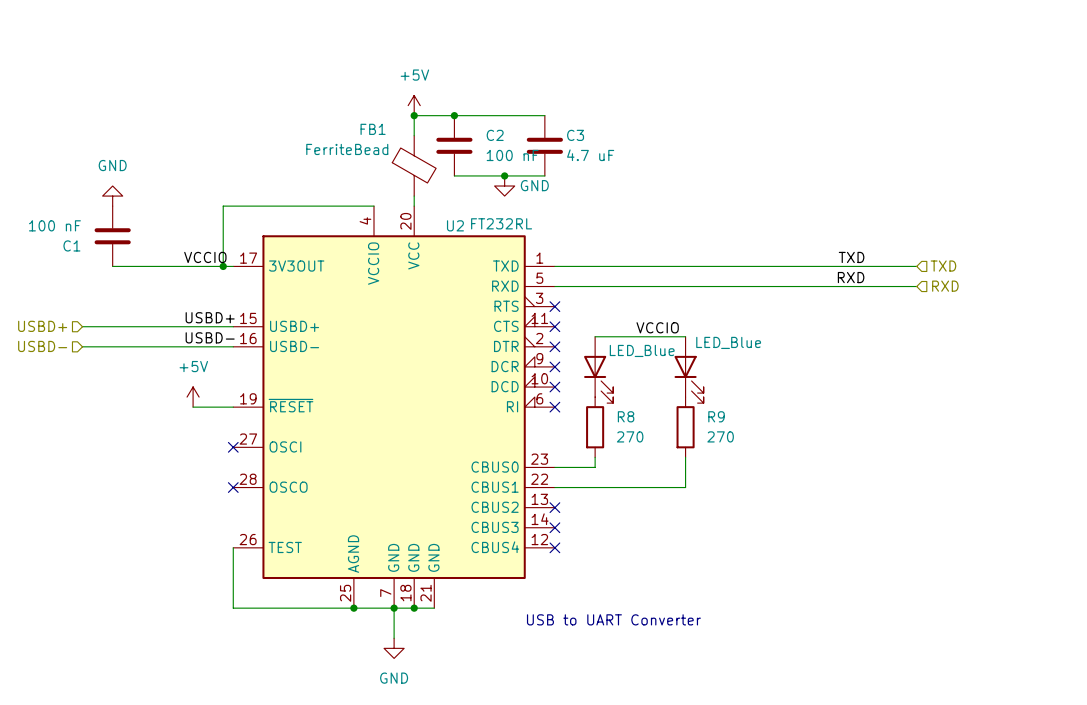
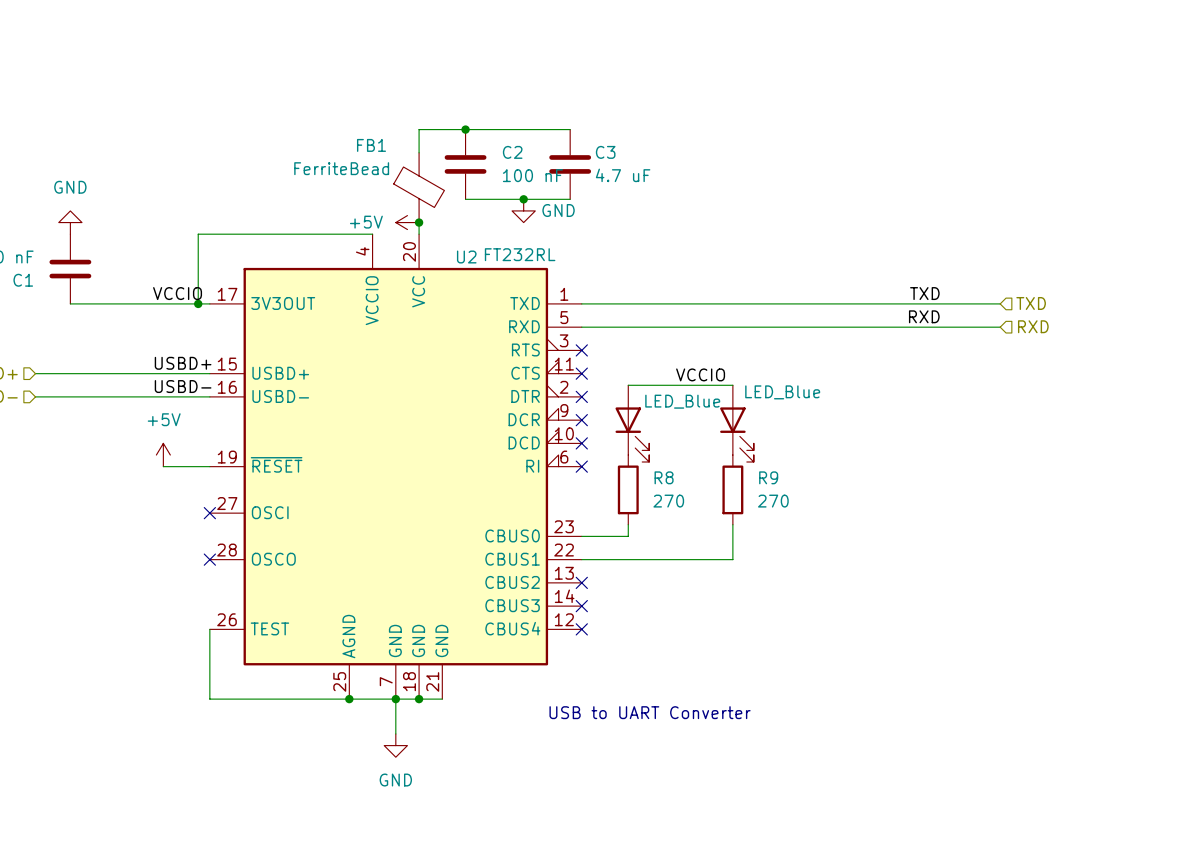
power symbol rotation: 0° (414, 105) -> 90° counterclockwise (407, 222)
power symbol position: +5V (414, 105) -> +5V (407, 222)
junction: (414, 115) -> none
junction: none -> (419, 222)

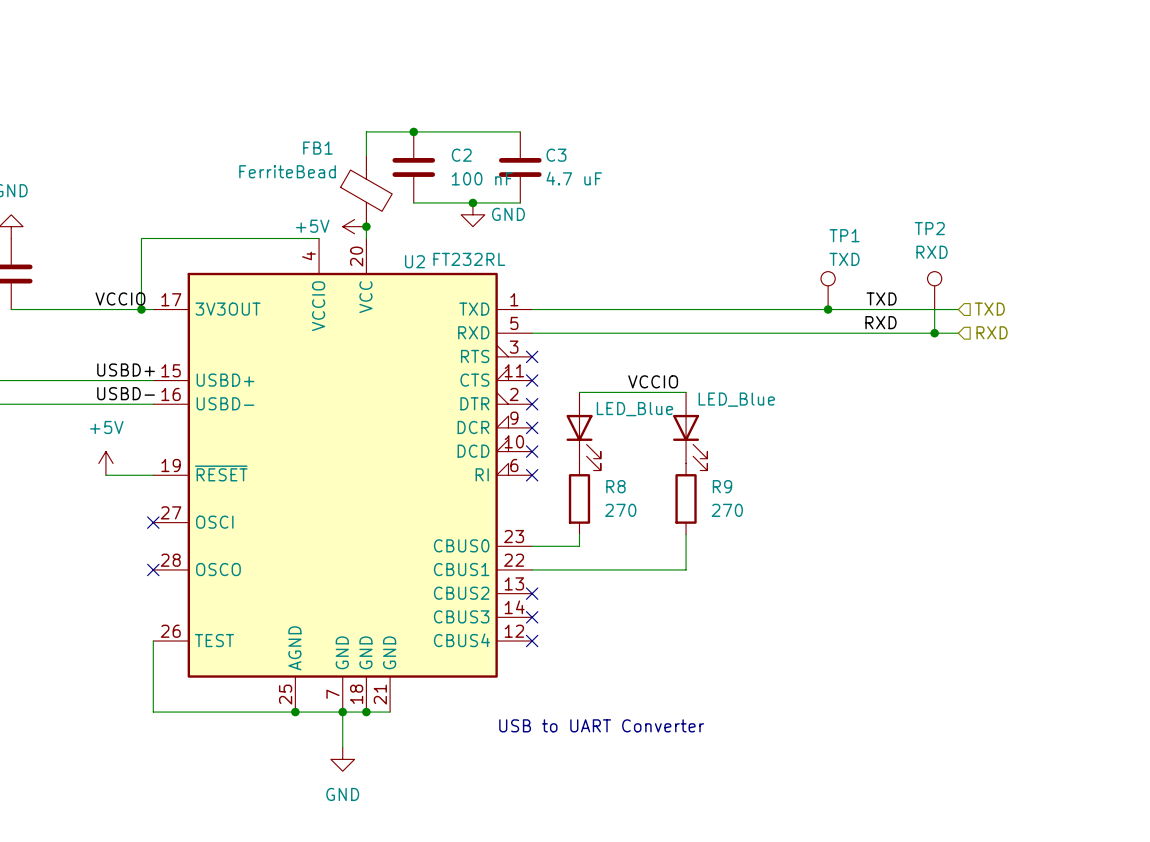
TP1: none -> TXD (828, 290)
TP2: none -> RXD (934, 290)
junction: none -> (828, 309)
wire: none -> (934, 309) (934, 333)
junction: none -> (934, 333)

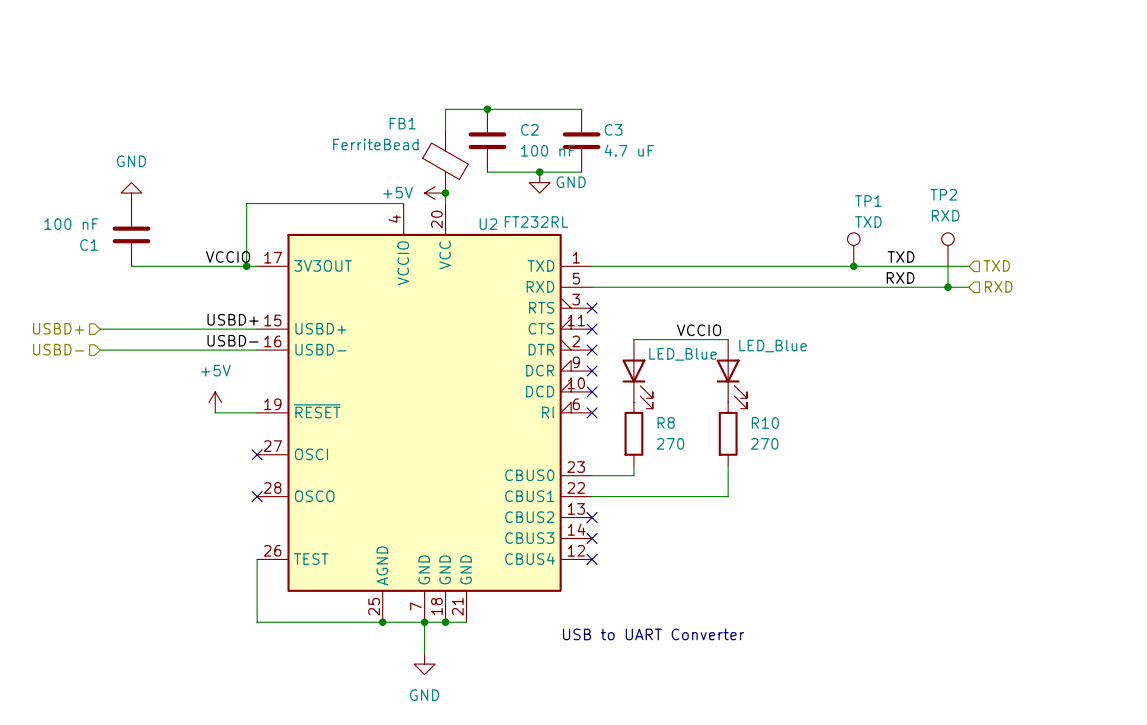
R9 name: R9 (722, 486) -> R10 (765, 422)

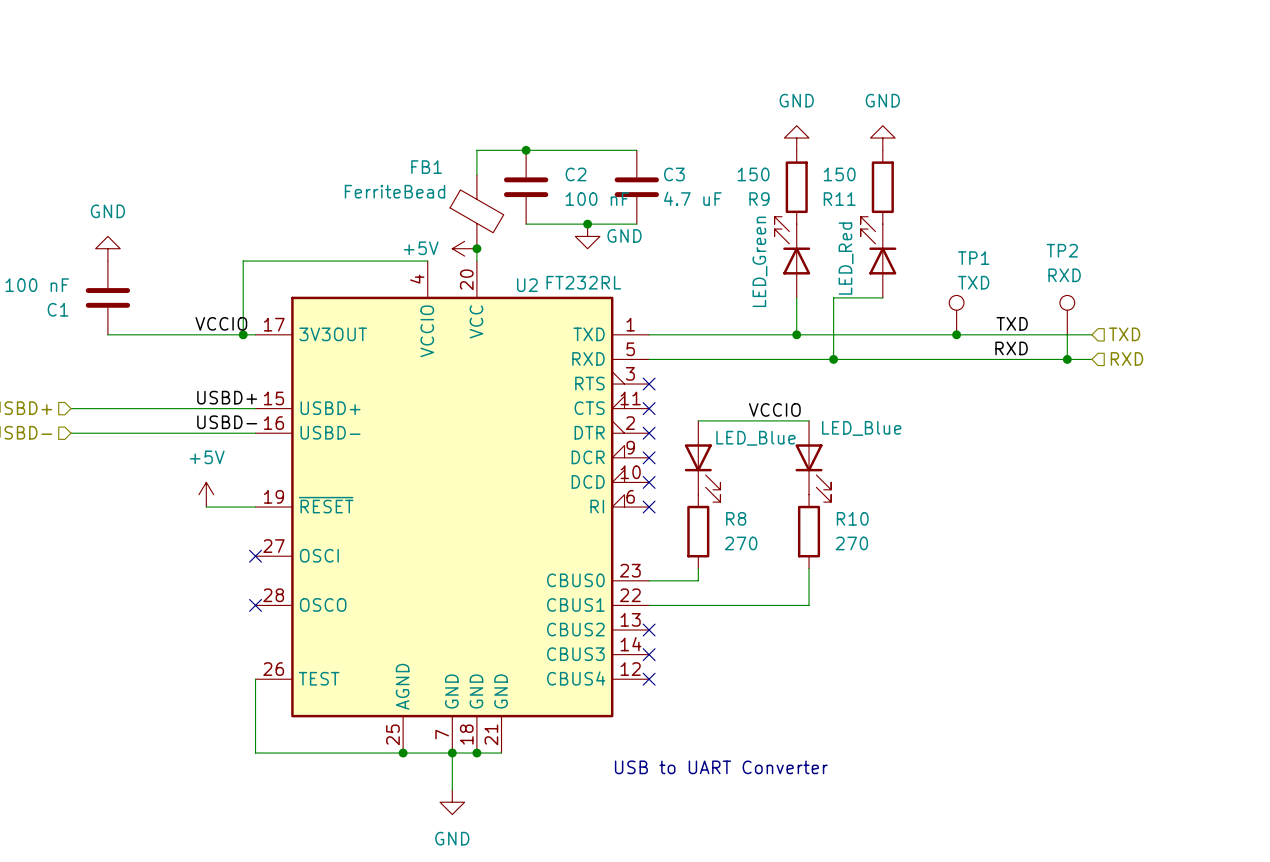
power symbol: none -> GND (796, 138)
power symbol: none -> GND (882, 138)
R9: none -> 150 (796, 187)
R11: none -> 150 (882, 187)
part: none -> LED_Green (792, 257)
part: none -> LED_Red (878, 257)
wire: none -> (796, 297) (796, 334)
wire: none -> (882, 297) (833, 297) (833, 359)
junction: none -> (796, 334)
junction: none -> (833, 359)

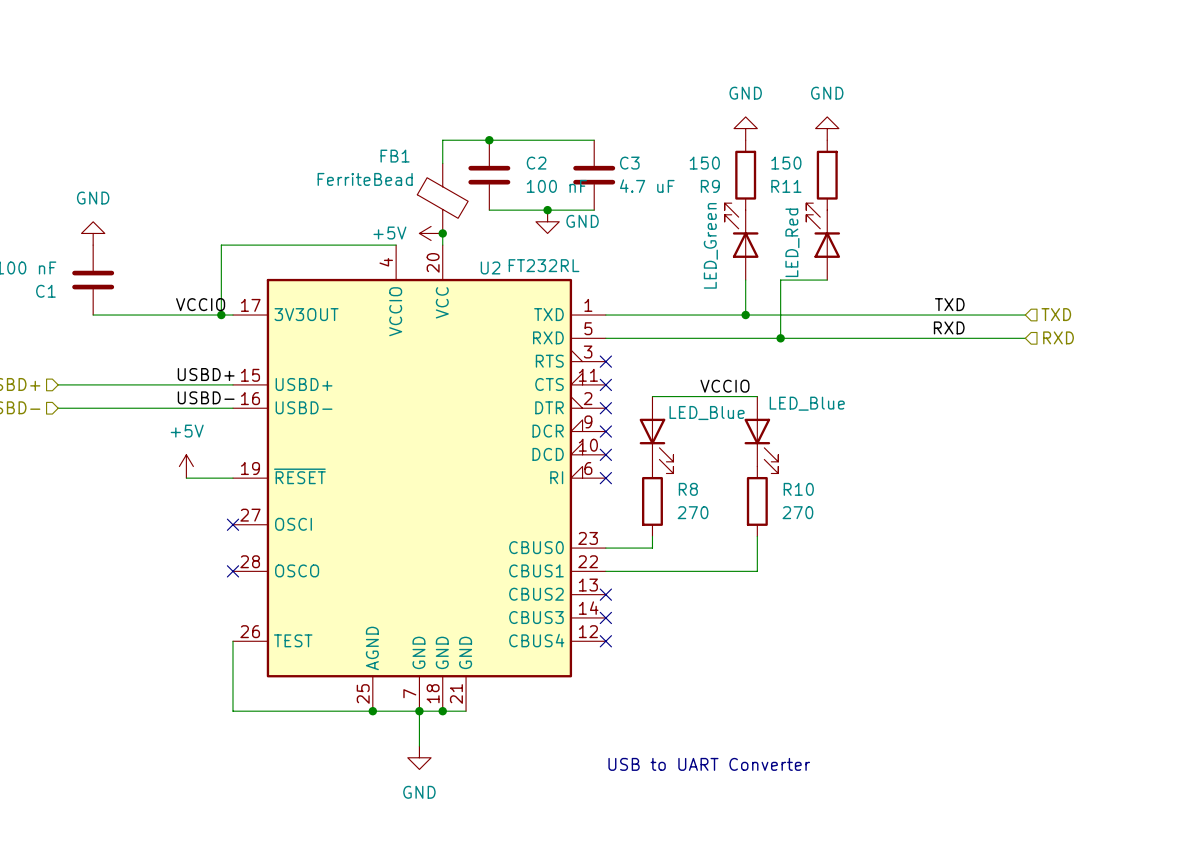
TP1: TXD (956, 315) -> none
TP2: RXD (1067, 315) -> none
junction: (956, 334) -> none
wire: (1067, 334) (1067, 359) -> none
junction: (1067, 359) -> none
text position: USB to UART Converter (721, 767) -> USB to UART Converter (709, 764)

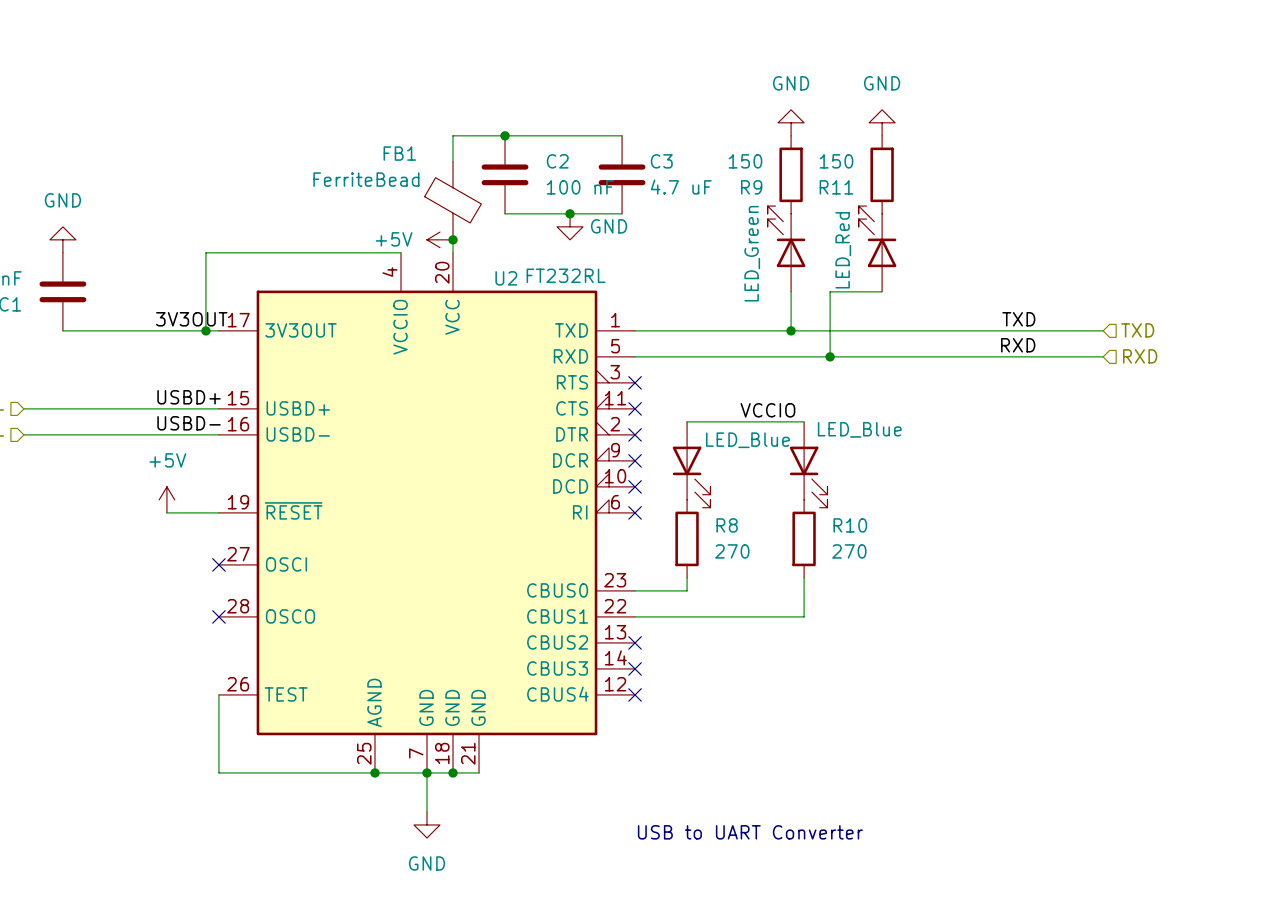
label: VCCIO (200, 304) -> 3V3OUT (191, 319)

